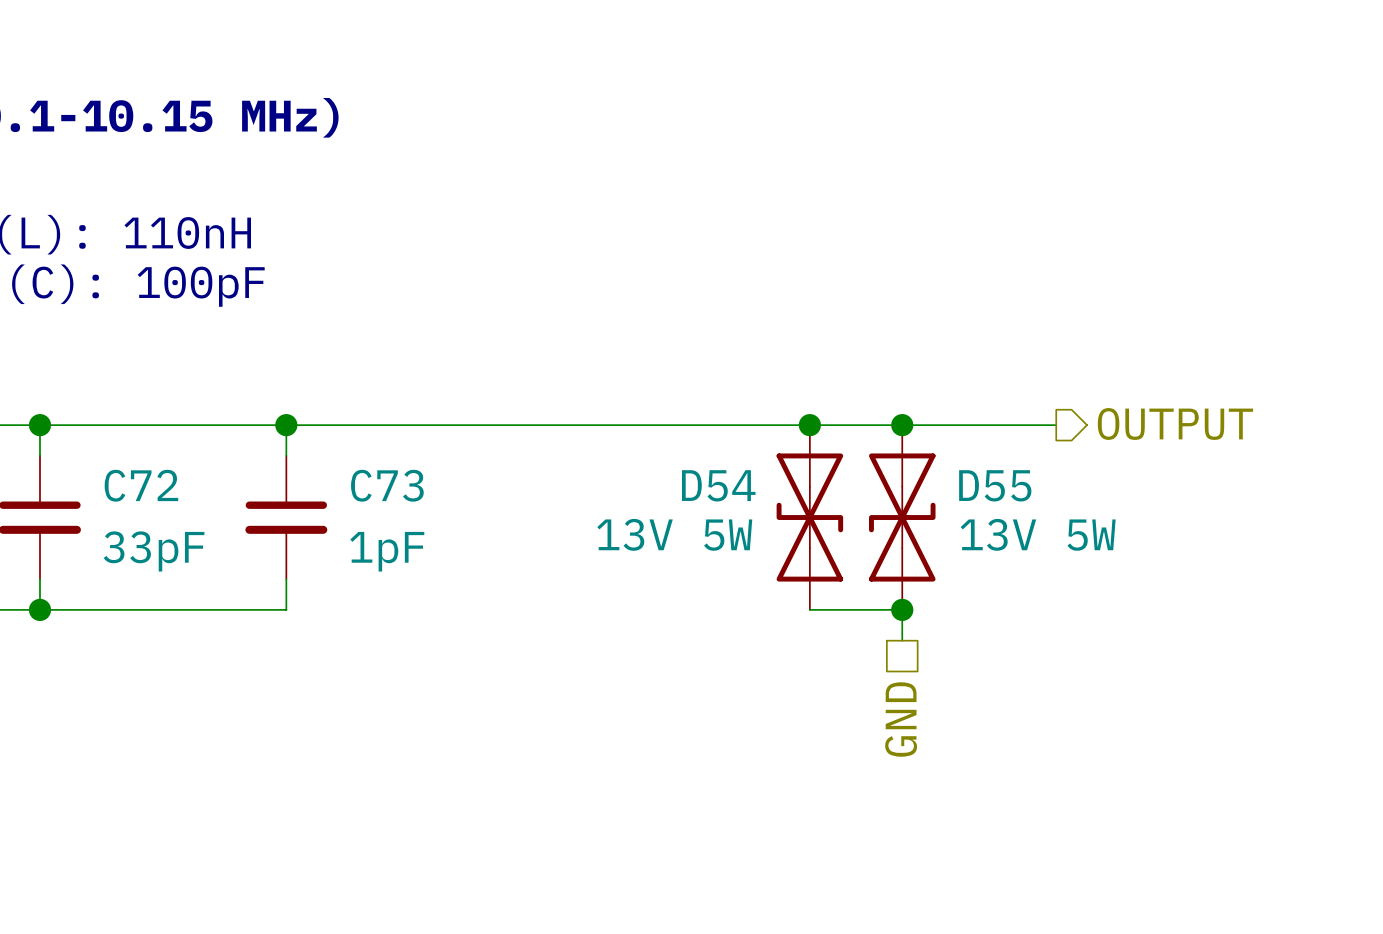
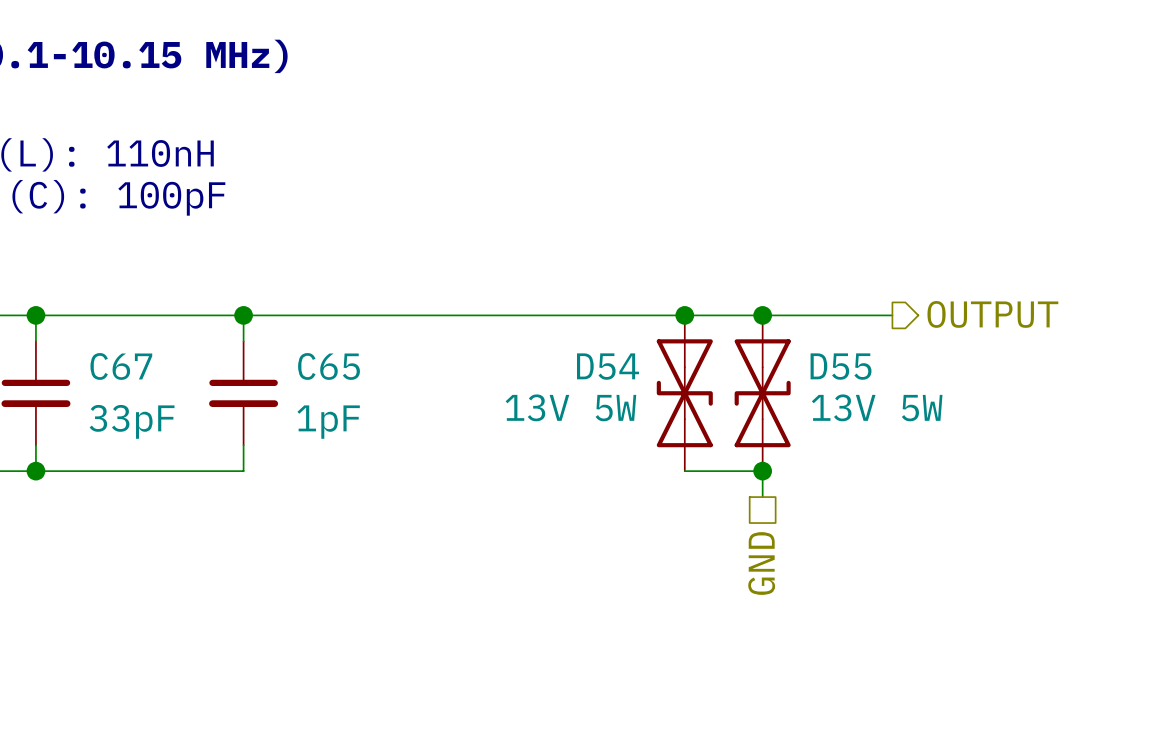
C72 name: C72 (141, 485) -> C67 (121, 366)
C73 name: C73 (387, 485) -> C65 (329, 366)

